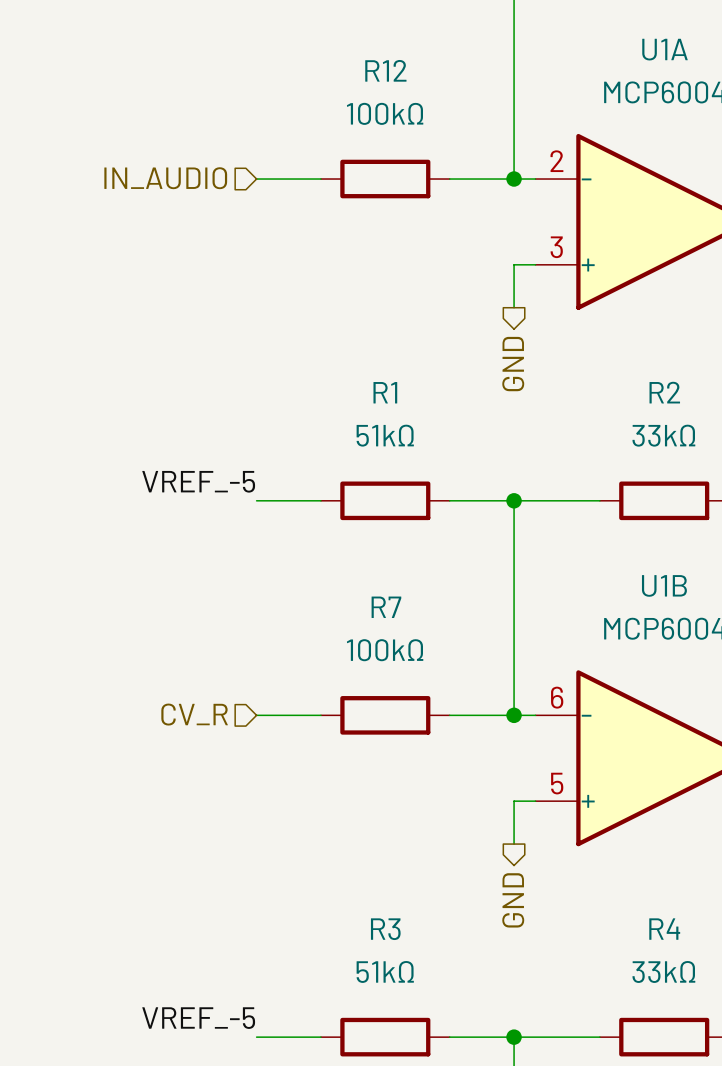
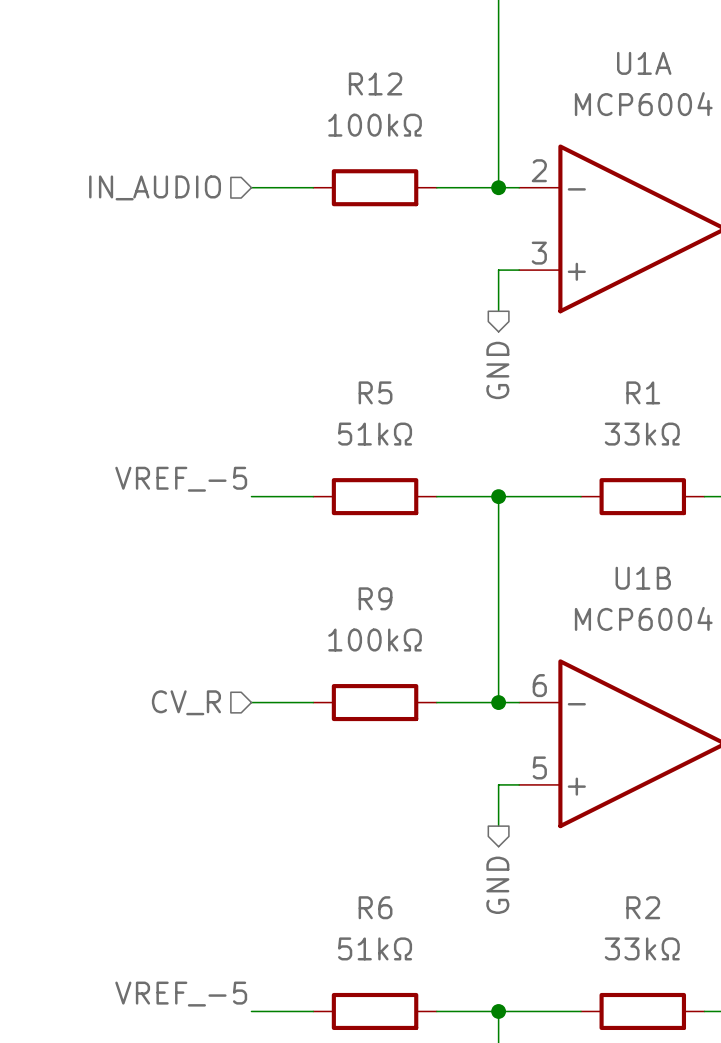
R1 name: R1 (385, 392) -> R5 (375, 392)
R2 name: R2 (664, 392) -> R1 (643, 392)
R7 name: R7 (386, 607) -> R9 (375, 598)
R3 name: R3 (385, 929) -> R6 (375, 907)
R4 name: R4 (664, 929) -> R2 (643, 907)

